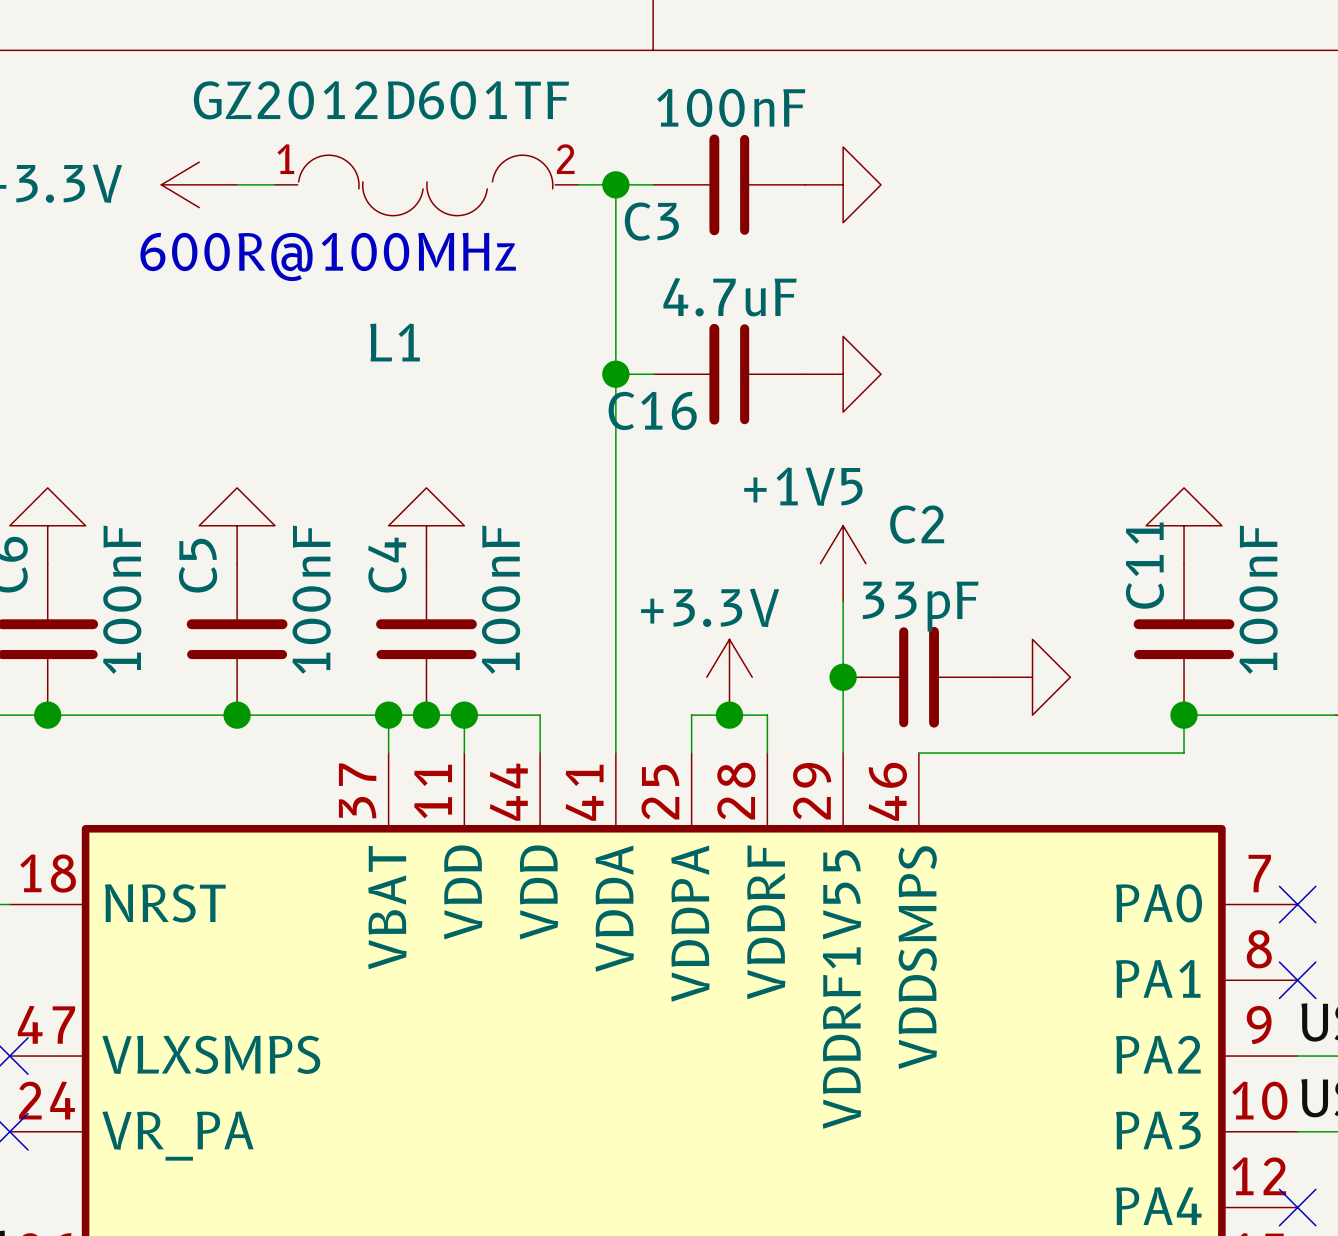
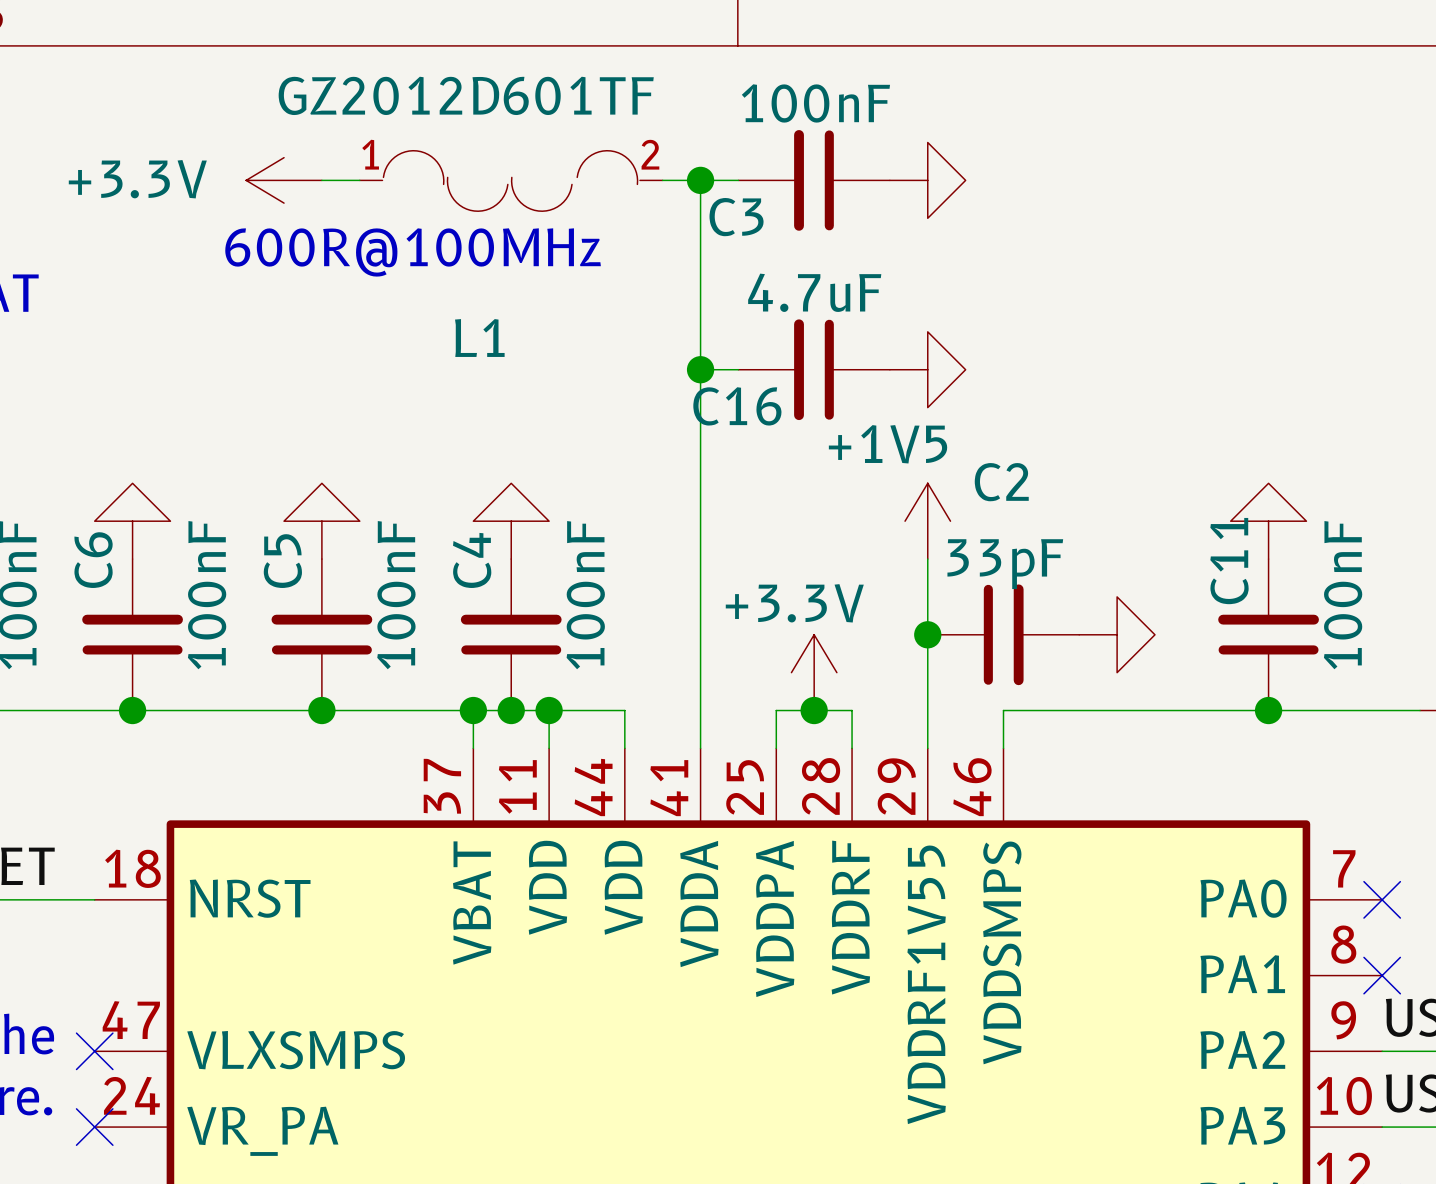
power symbol position: +1V5 (843, 563) -> +1V5 (927, 521)
junction position: (843, 677) -> (927, 634)
C2 position: (918, 677) -> (1003, 634)
power symbol position: (1032, 677) -> (1117, 634)
wire: (1184, 715) (1184, 753) (918, 753) -> (1268, 710) (1003, 710) (1003, 748)

